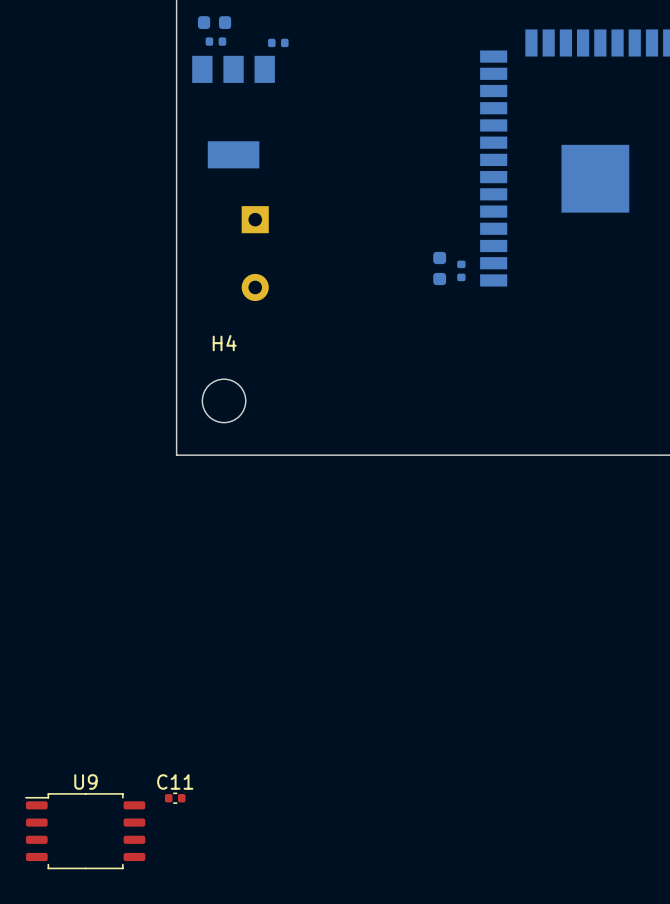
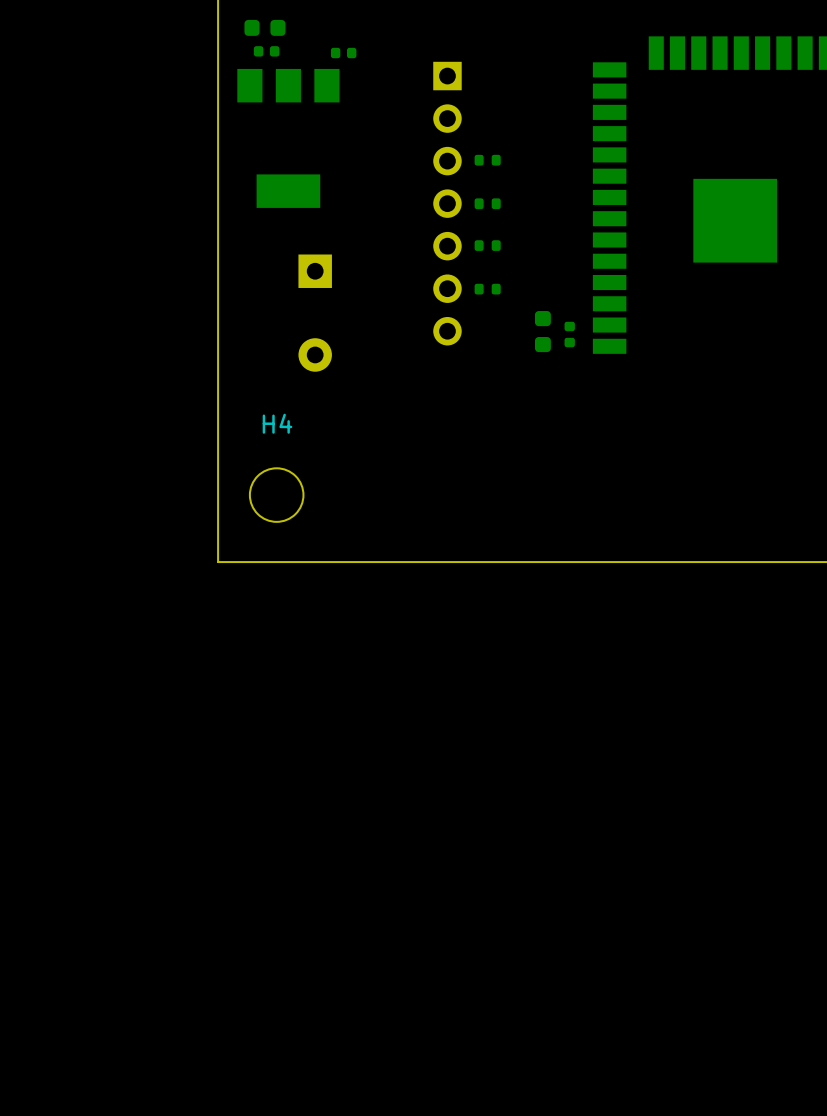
part: none -> (487, 160)
part: none -> (447, 203)
part: none -> (487, 203)
part: none -> (487, 245)
part: none -> (487, 289)
C11: (175, 798) -> none
U9: (85, 831) -> none

